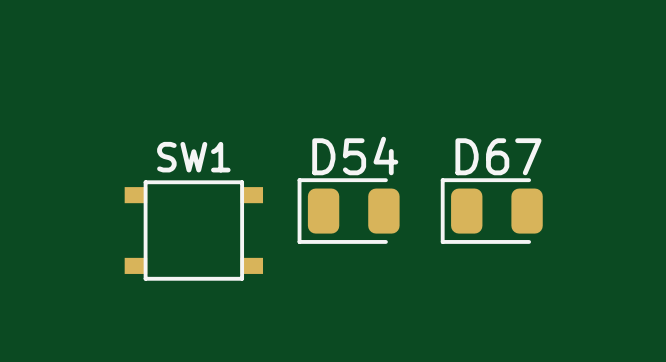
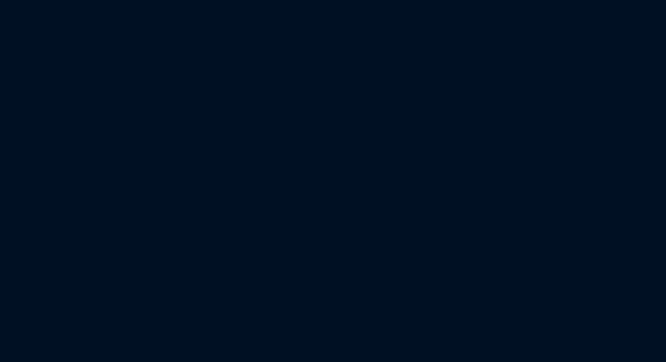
D54: (348, 211) -> none
D67: (491, 211) -> none
SW1: (193, 230) -> none

